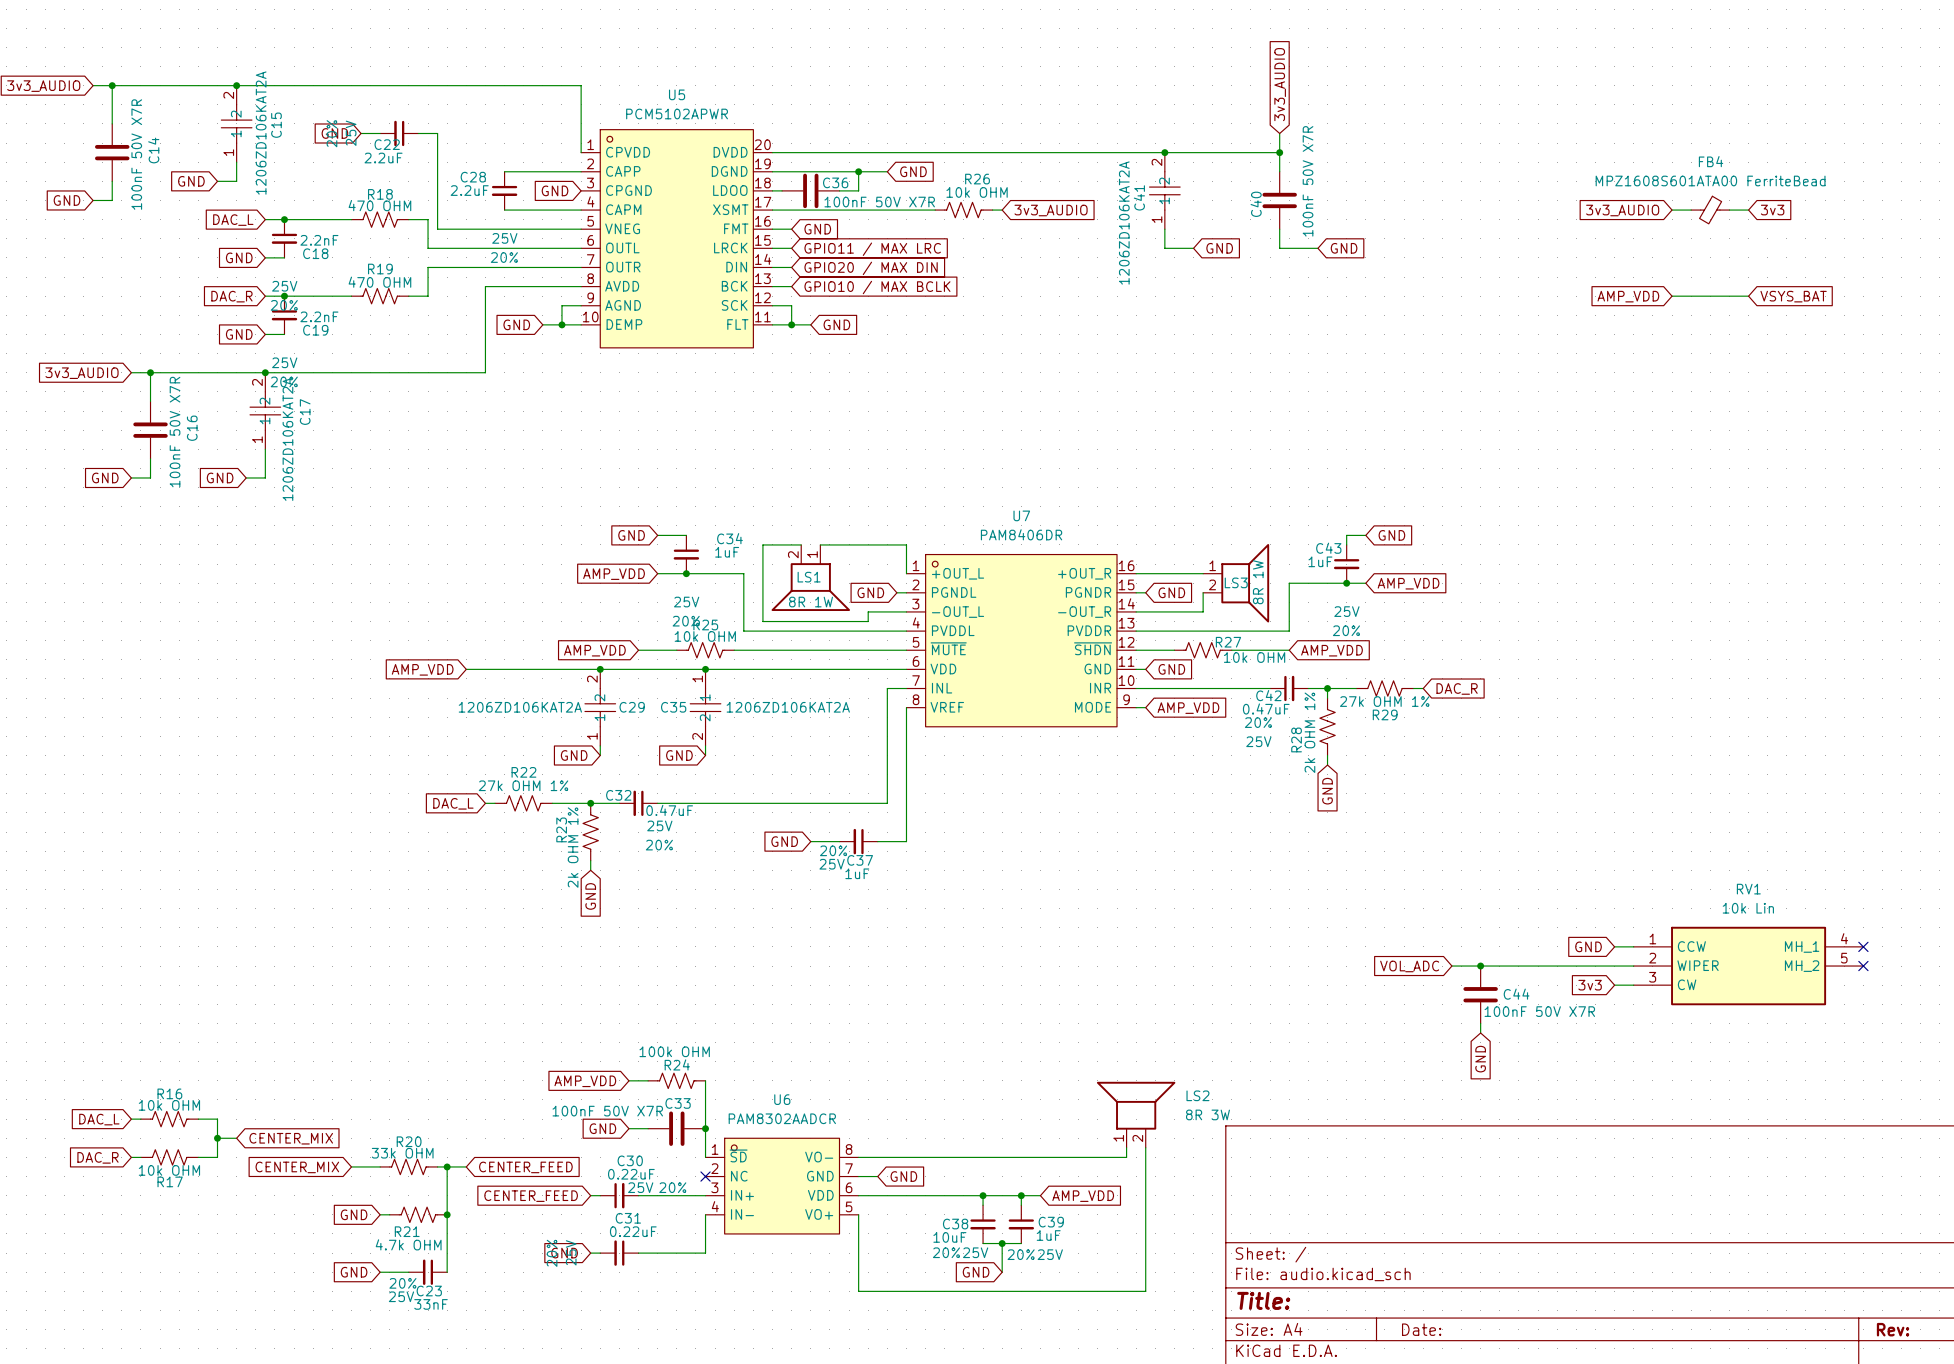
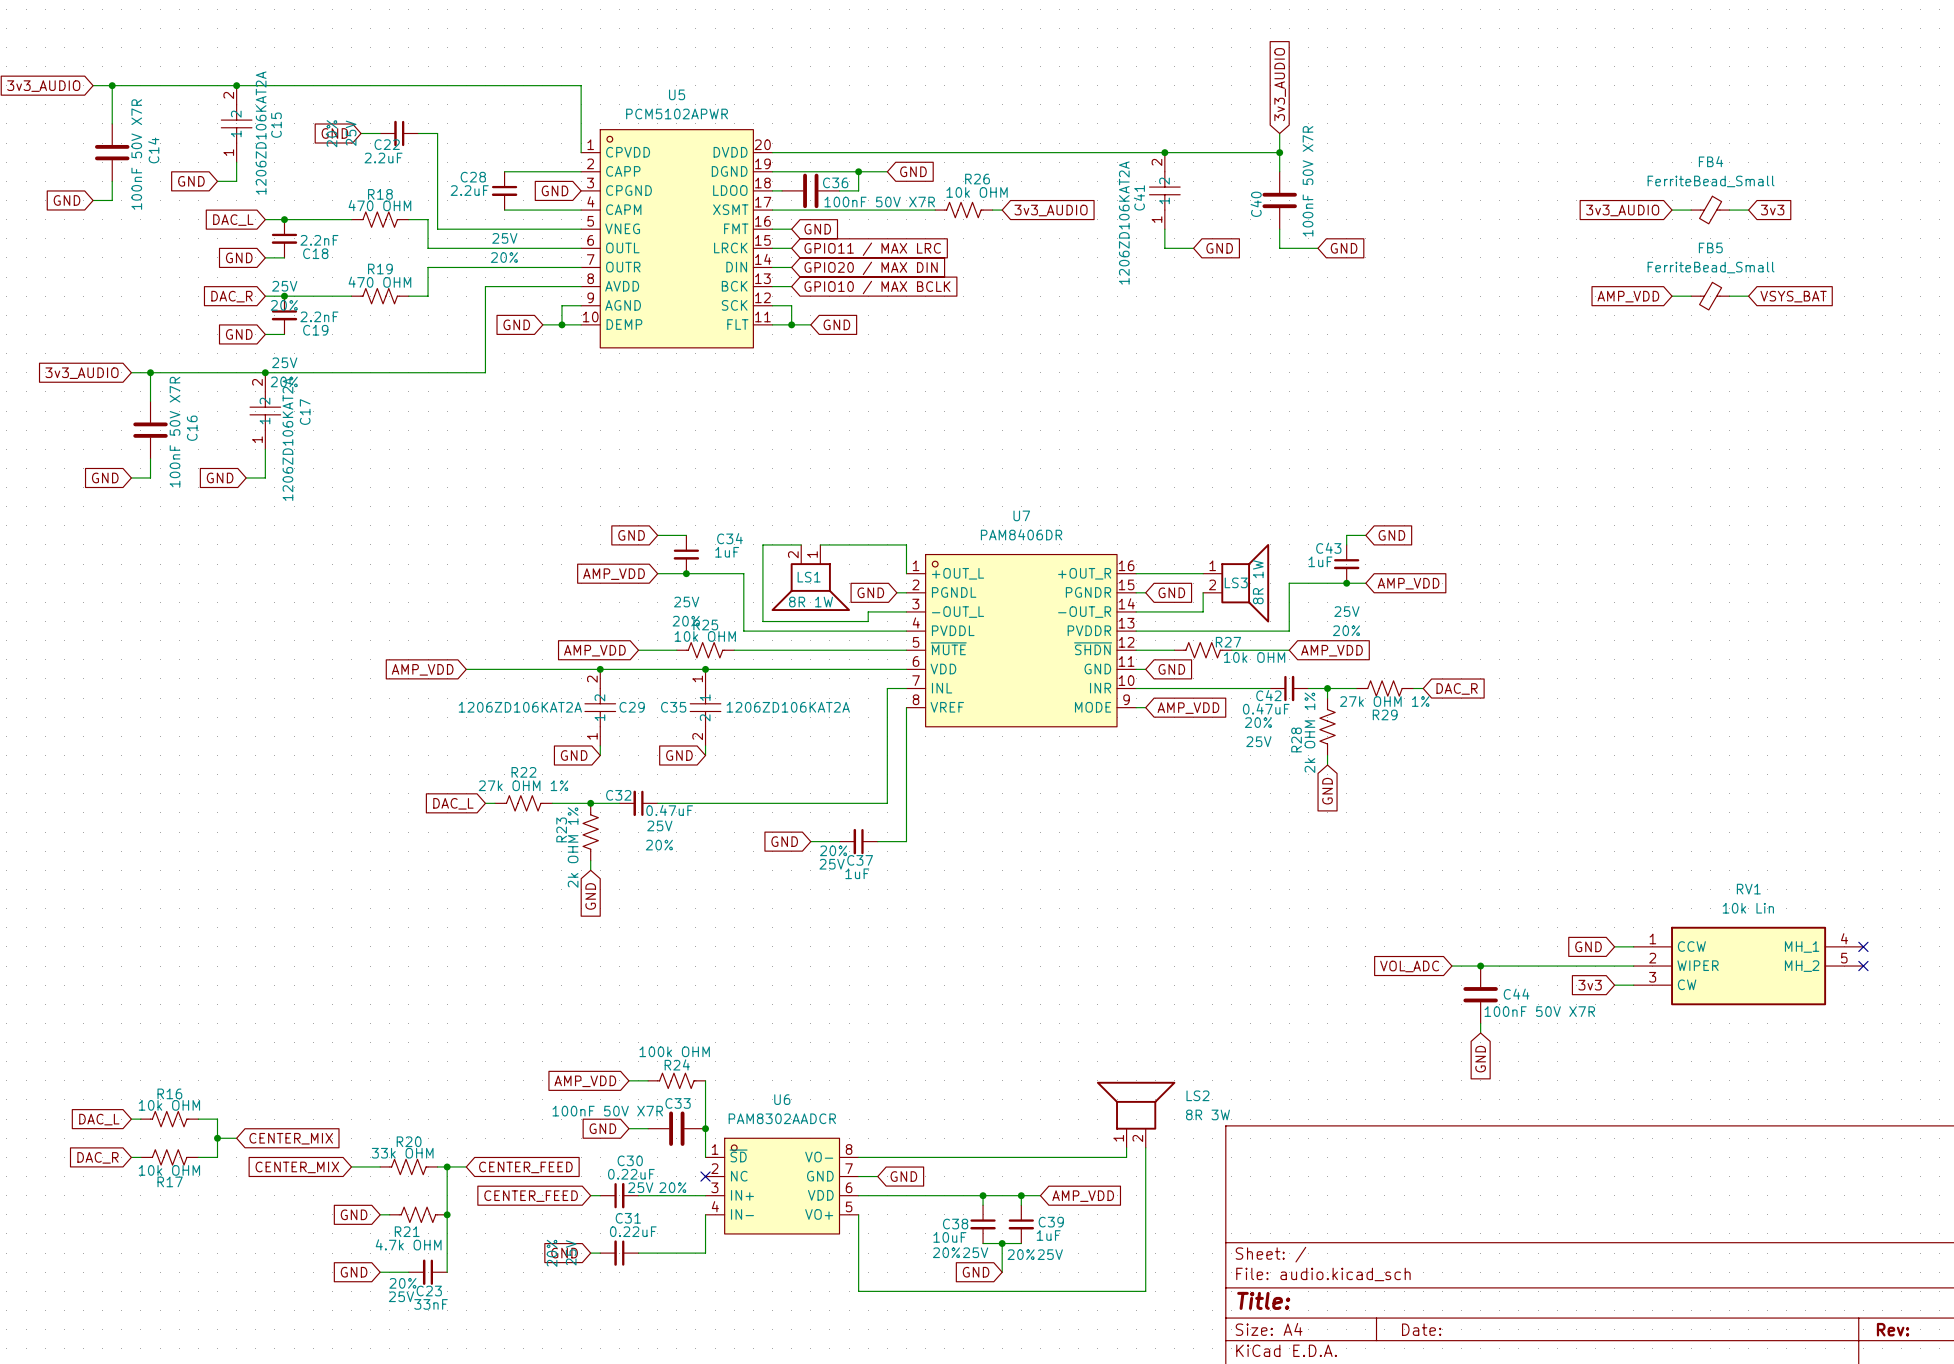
FB4 value: MPZ1608S601ATA00 FerriteBead (1710, 180) -> FerriteBead_Small (1711, 181)
FB5: none -> FerriteBead_Small (1710, 296)

